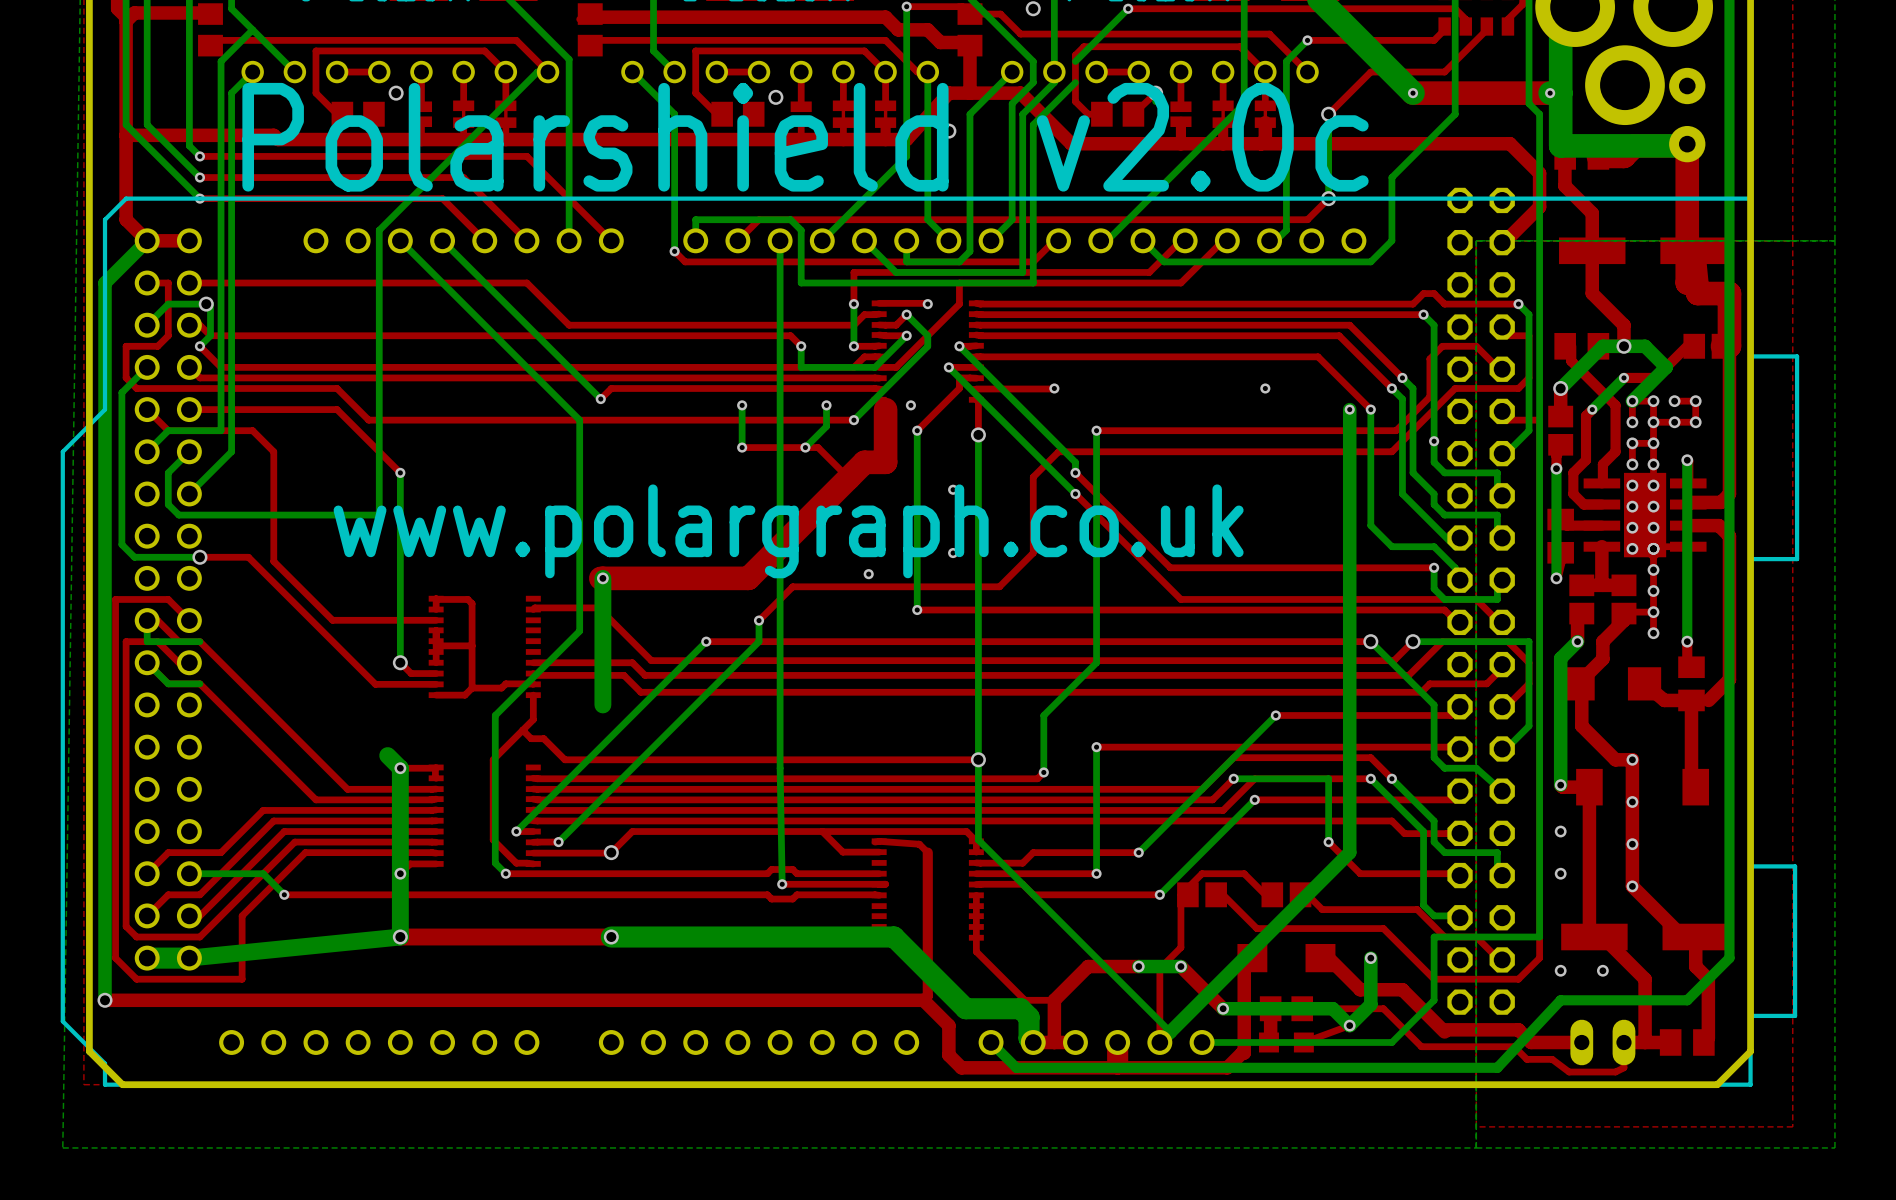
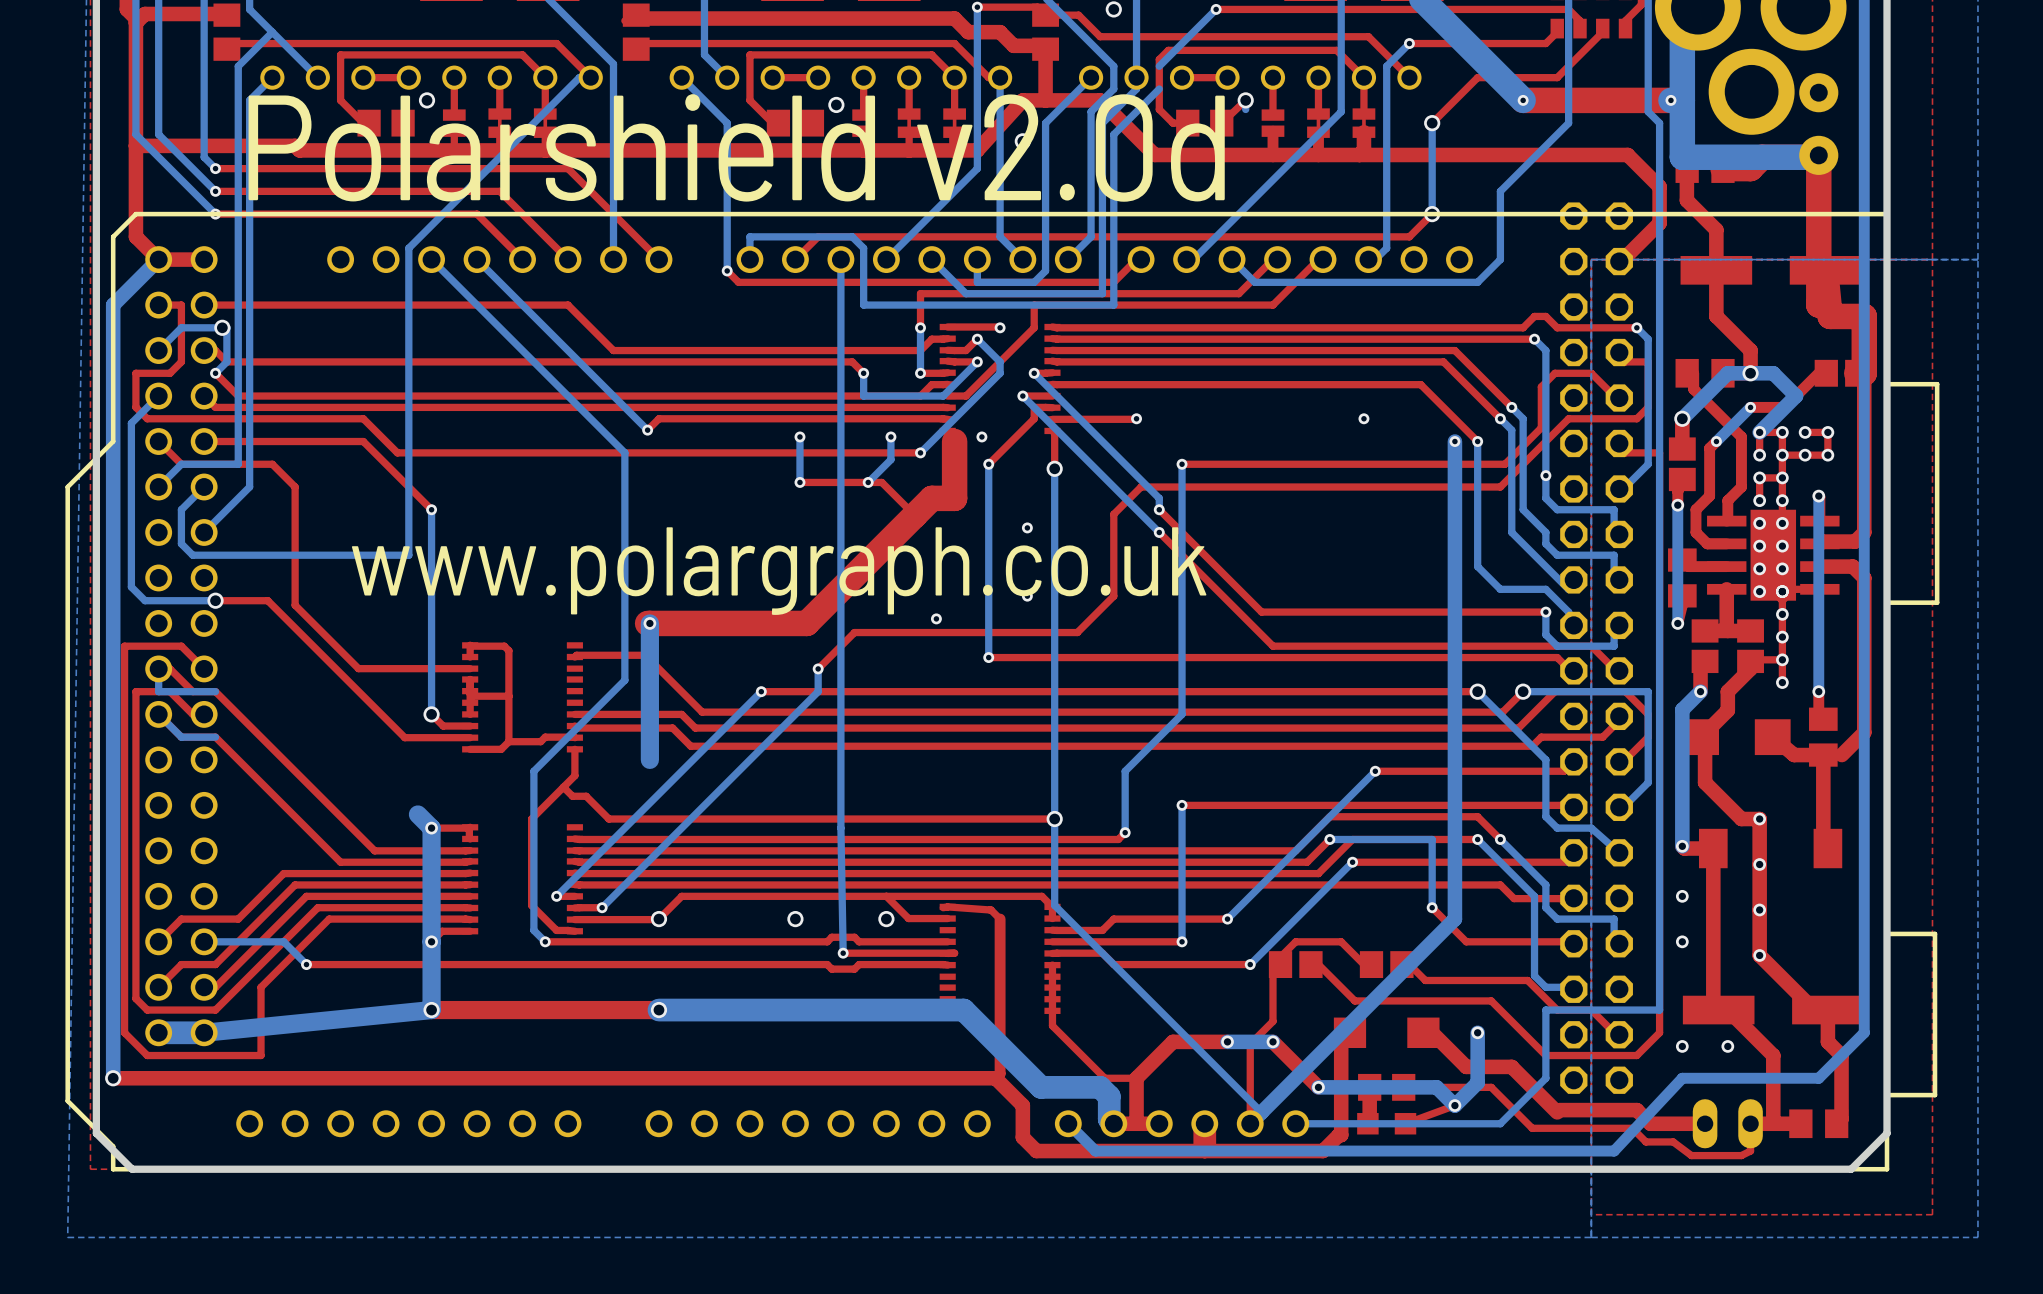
text: Polarshield v2.0c (805, 137) -> Polarshield v2.0d (736, 147)
via: none -> (795, 919)
via: none -> (886, 919)

